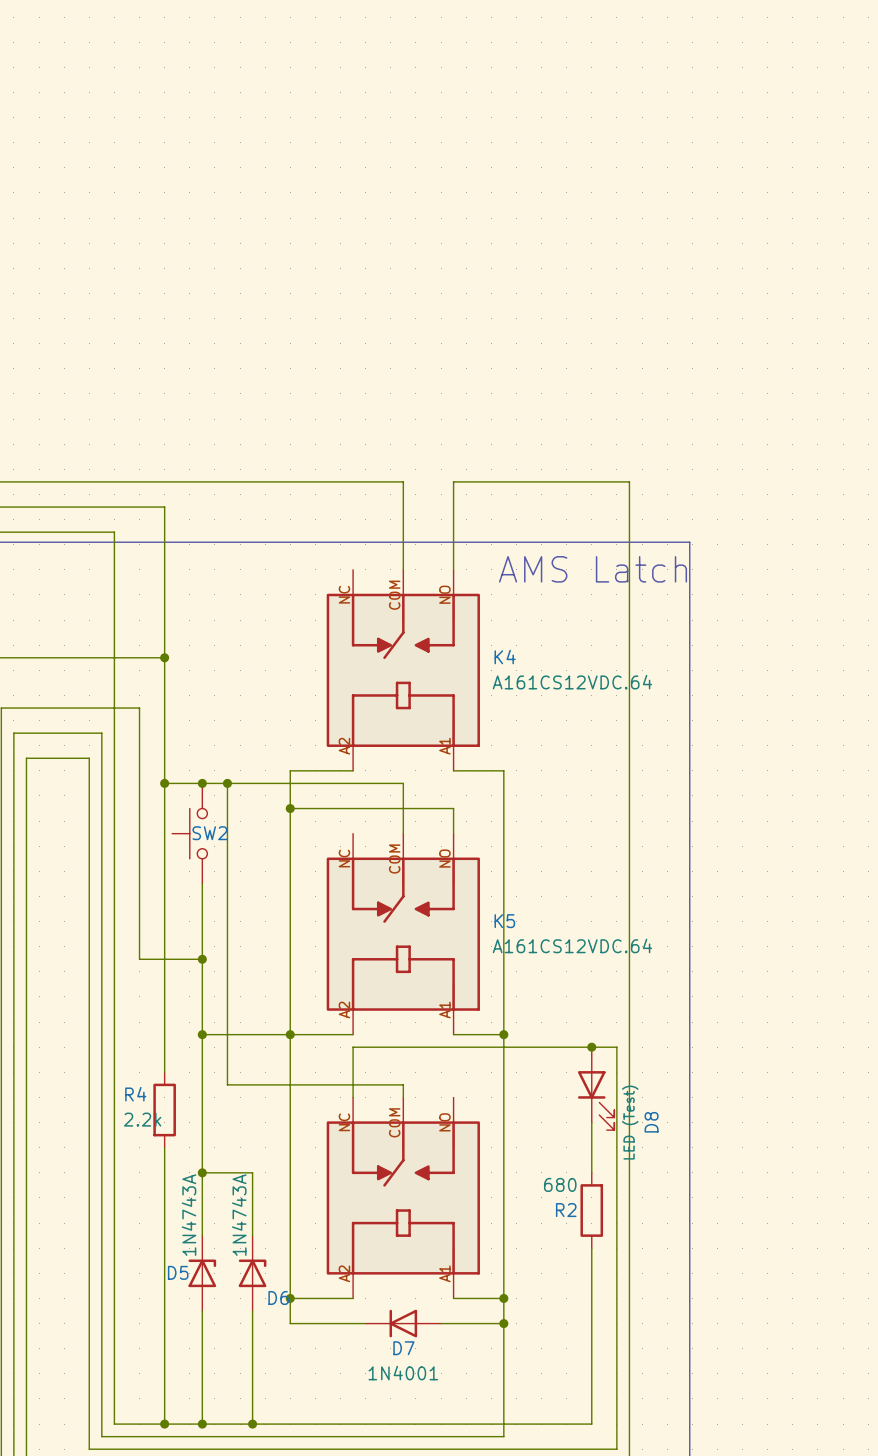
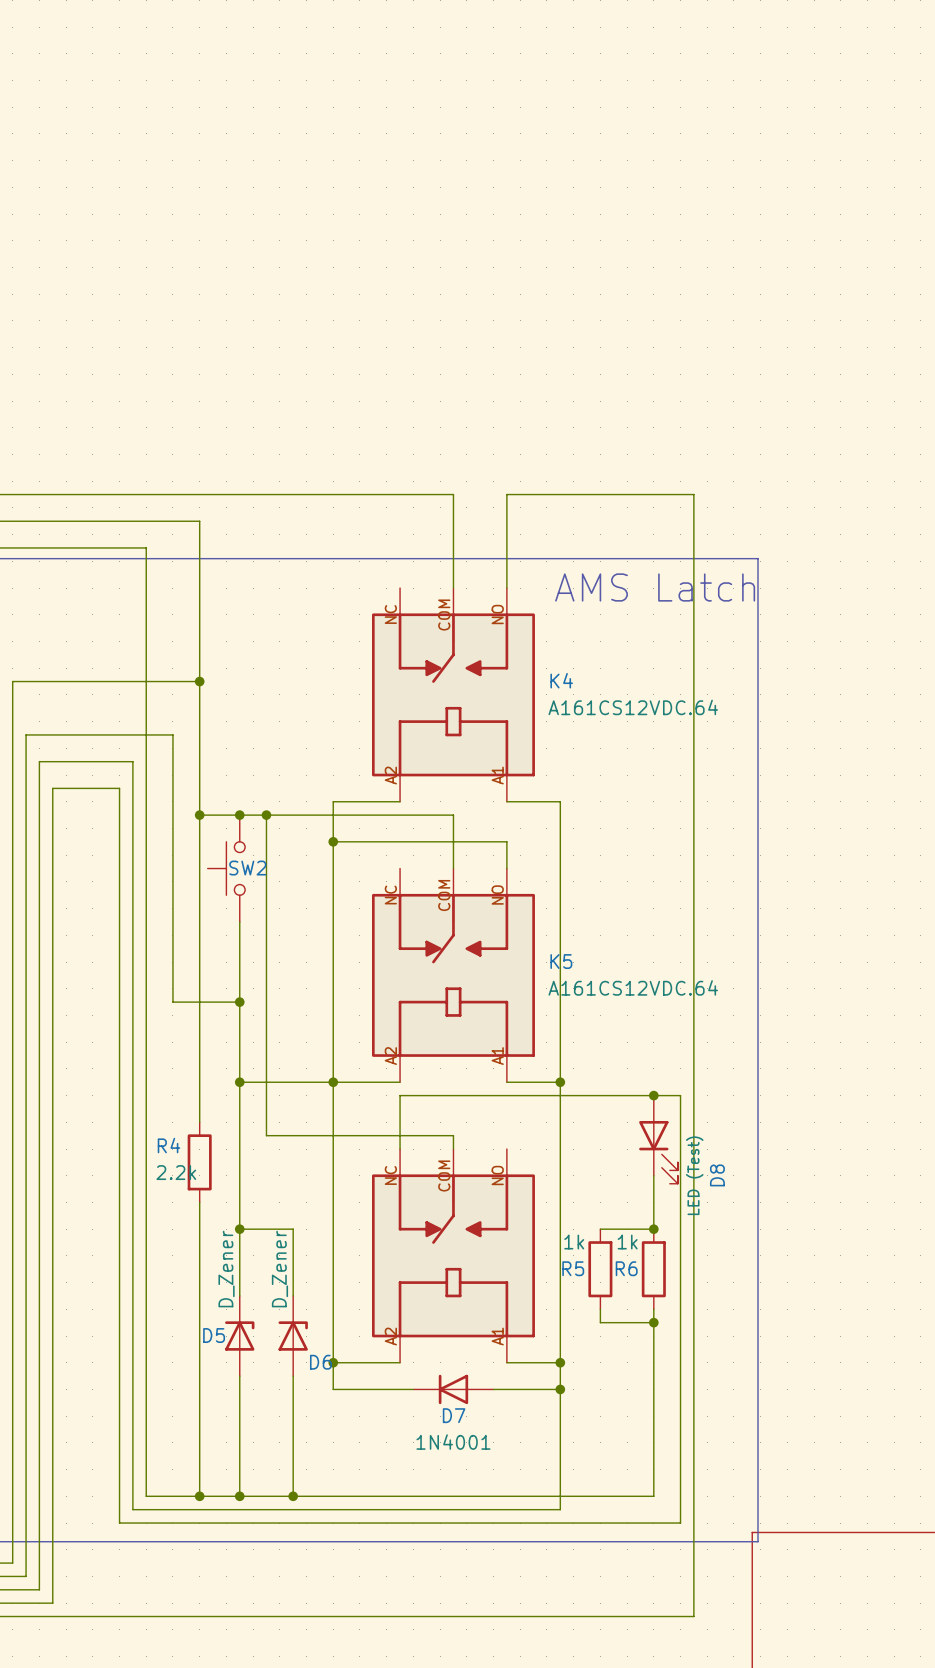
wire: none -> (600, 1229) (653, 1229)
junction: none -> (653, 1229)
R2 value: 680 (560, 1184) -> 1k (627, 1242)
R5: none -> 1k (600, 1269)
R2 name: R2 (566, 1210) -> R6 (626, 1268)
D5 value: 1N4743A (189, 1215) -> D_Zener (226, 1269)
D6 value: 1N4743A (239, 1215) -> D_Zener (279, 1269)
wire: none -> (600, 1309) (600, 1322) (653, 1322)
junction: none -> (653, 1322)

